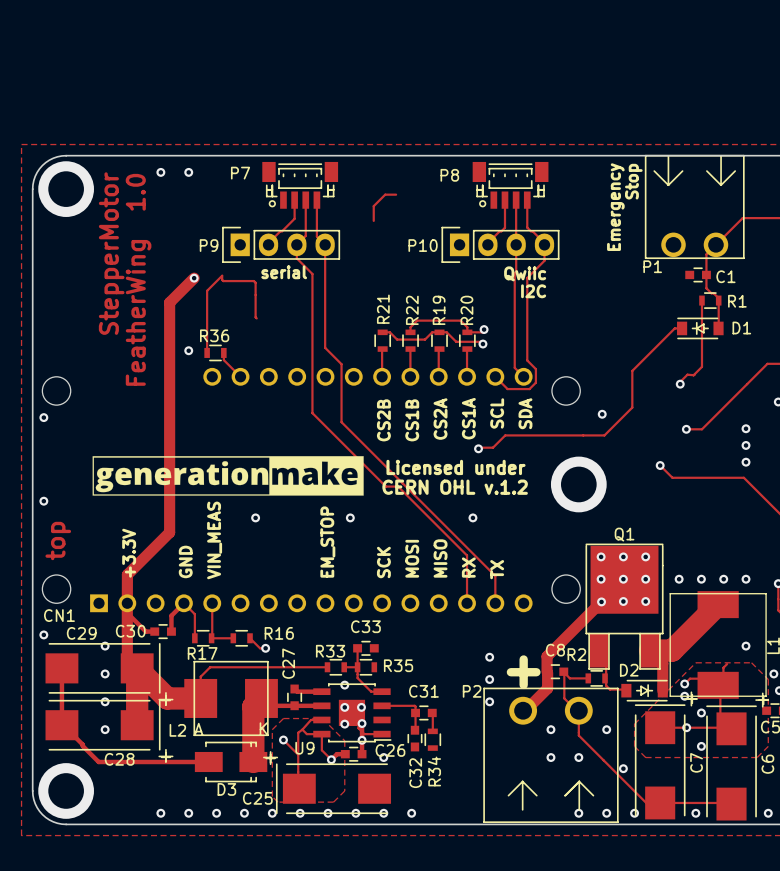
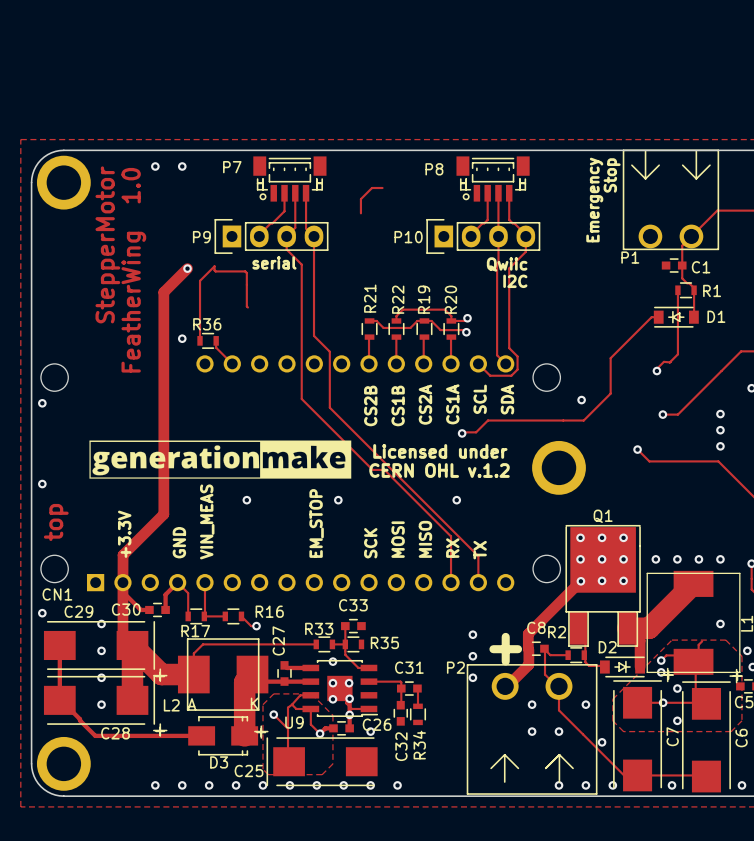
part: none -> (63, 182)
via: (66, 189) -> none
part: none -> (558, 467)
via: (578, 484) -> none
part: none -> (63, 763)
via: (66, 790) -> none

